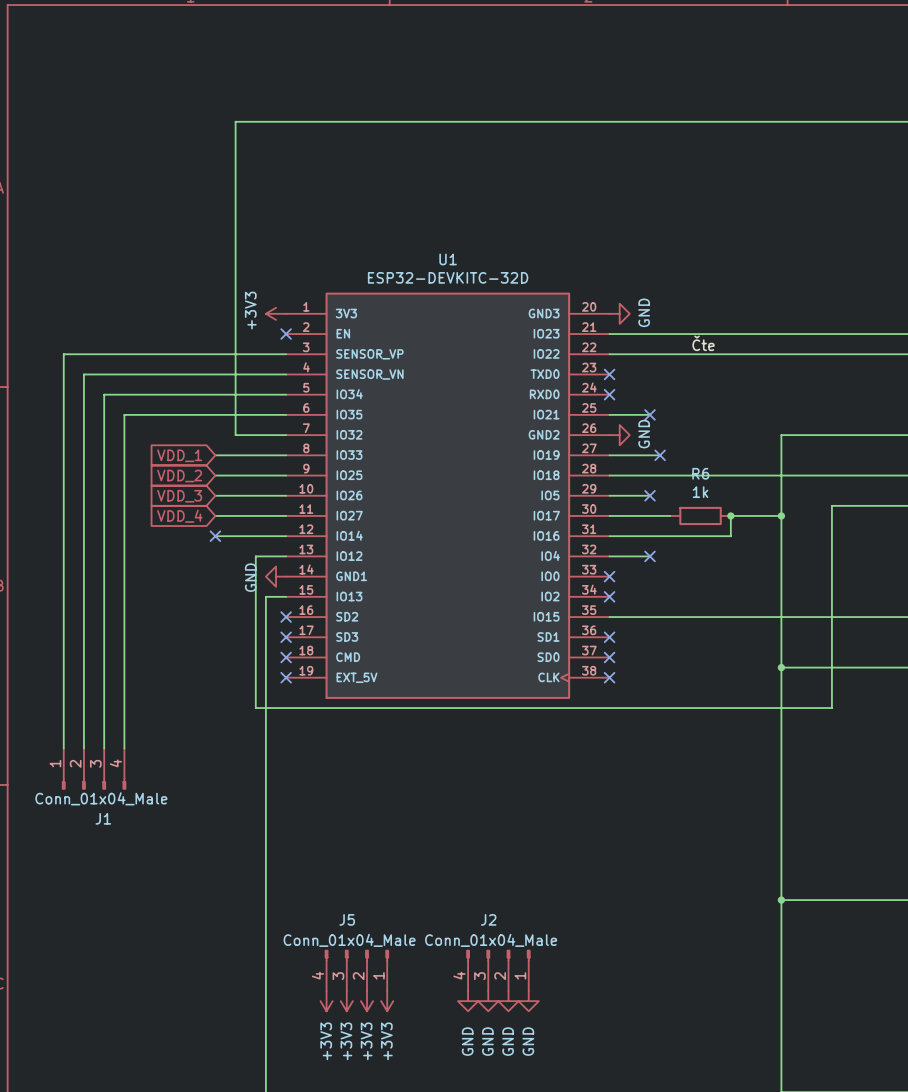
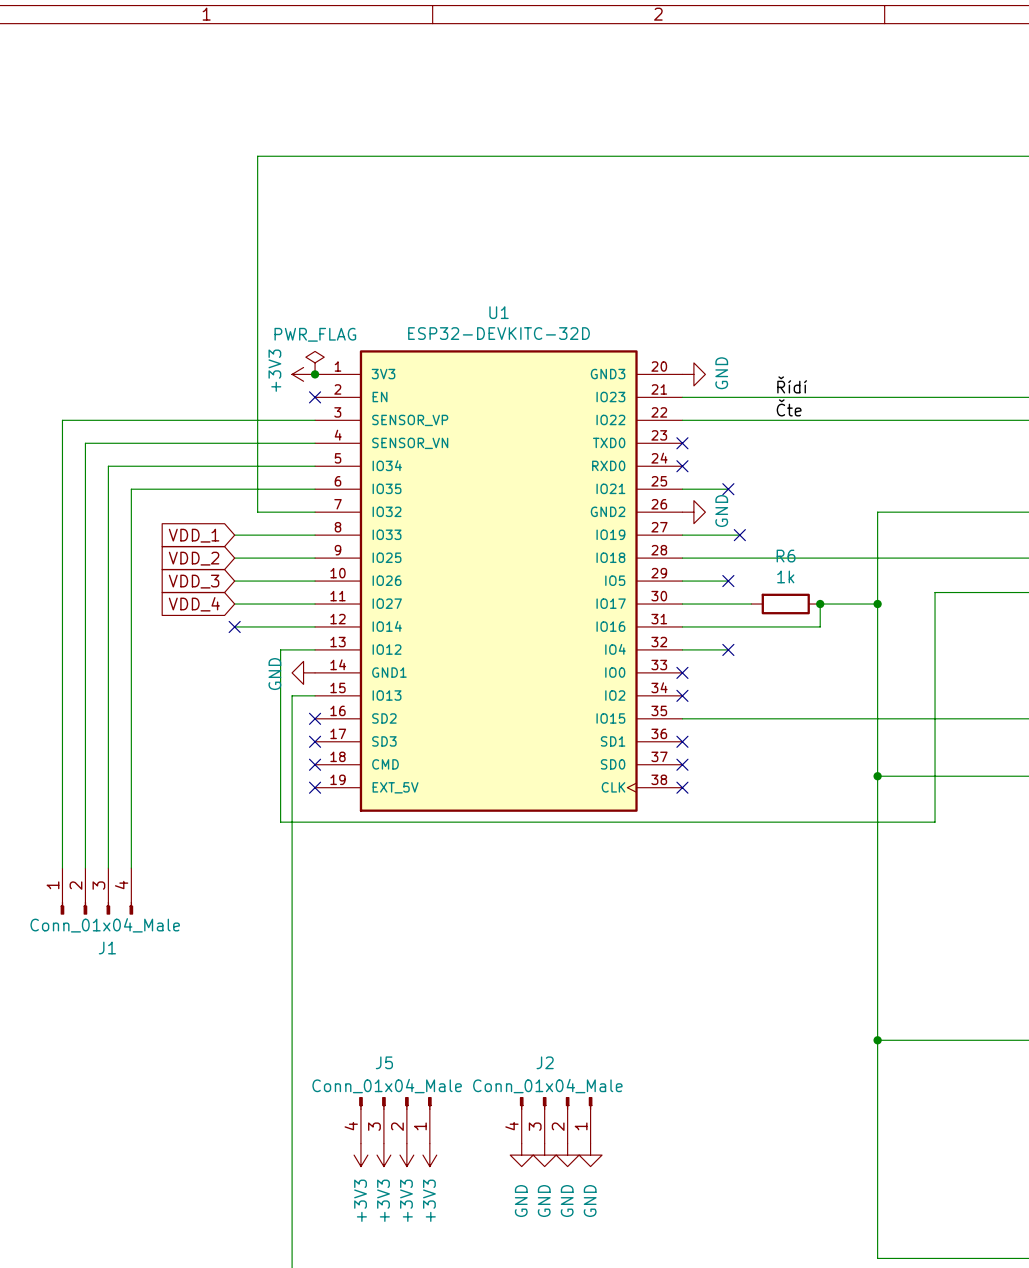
power symbol: none -> PWR_FLAG (315, 362)
junction: none -> (315, 374)
label: none -> Řídí (792, 384)

